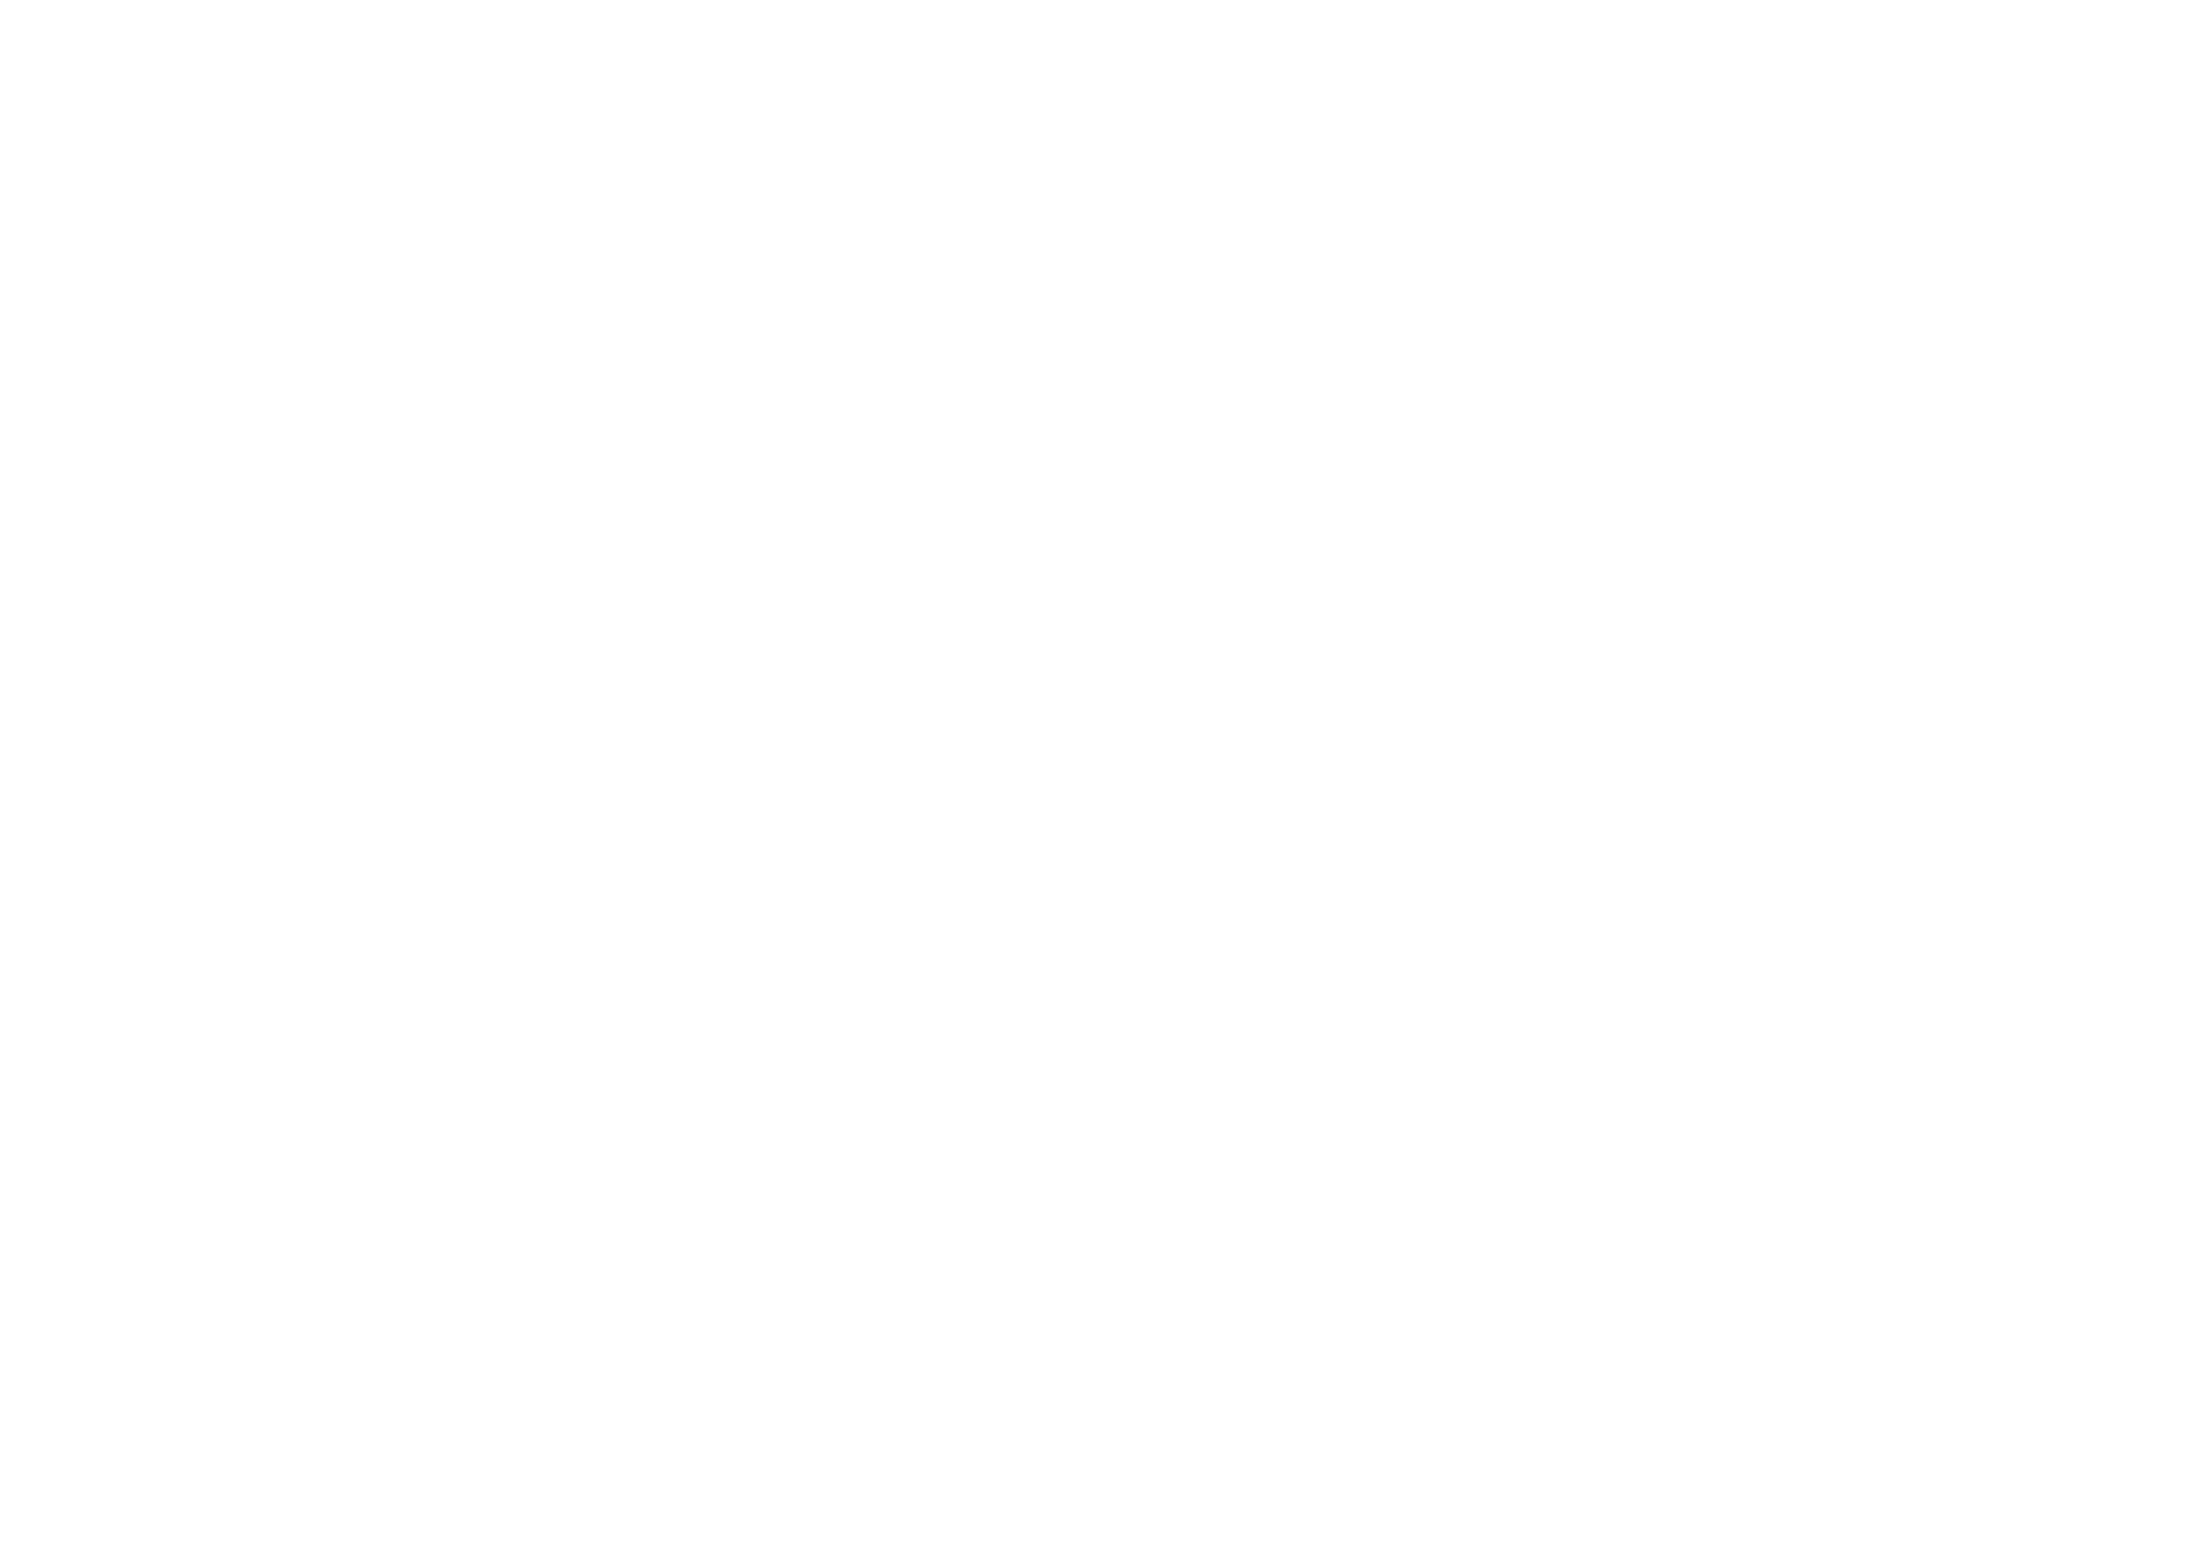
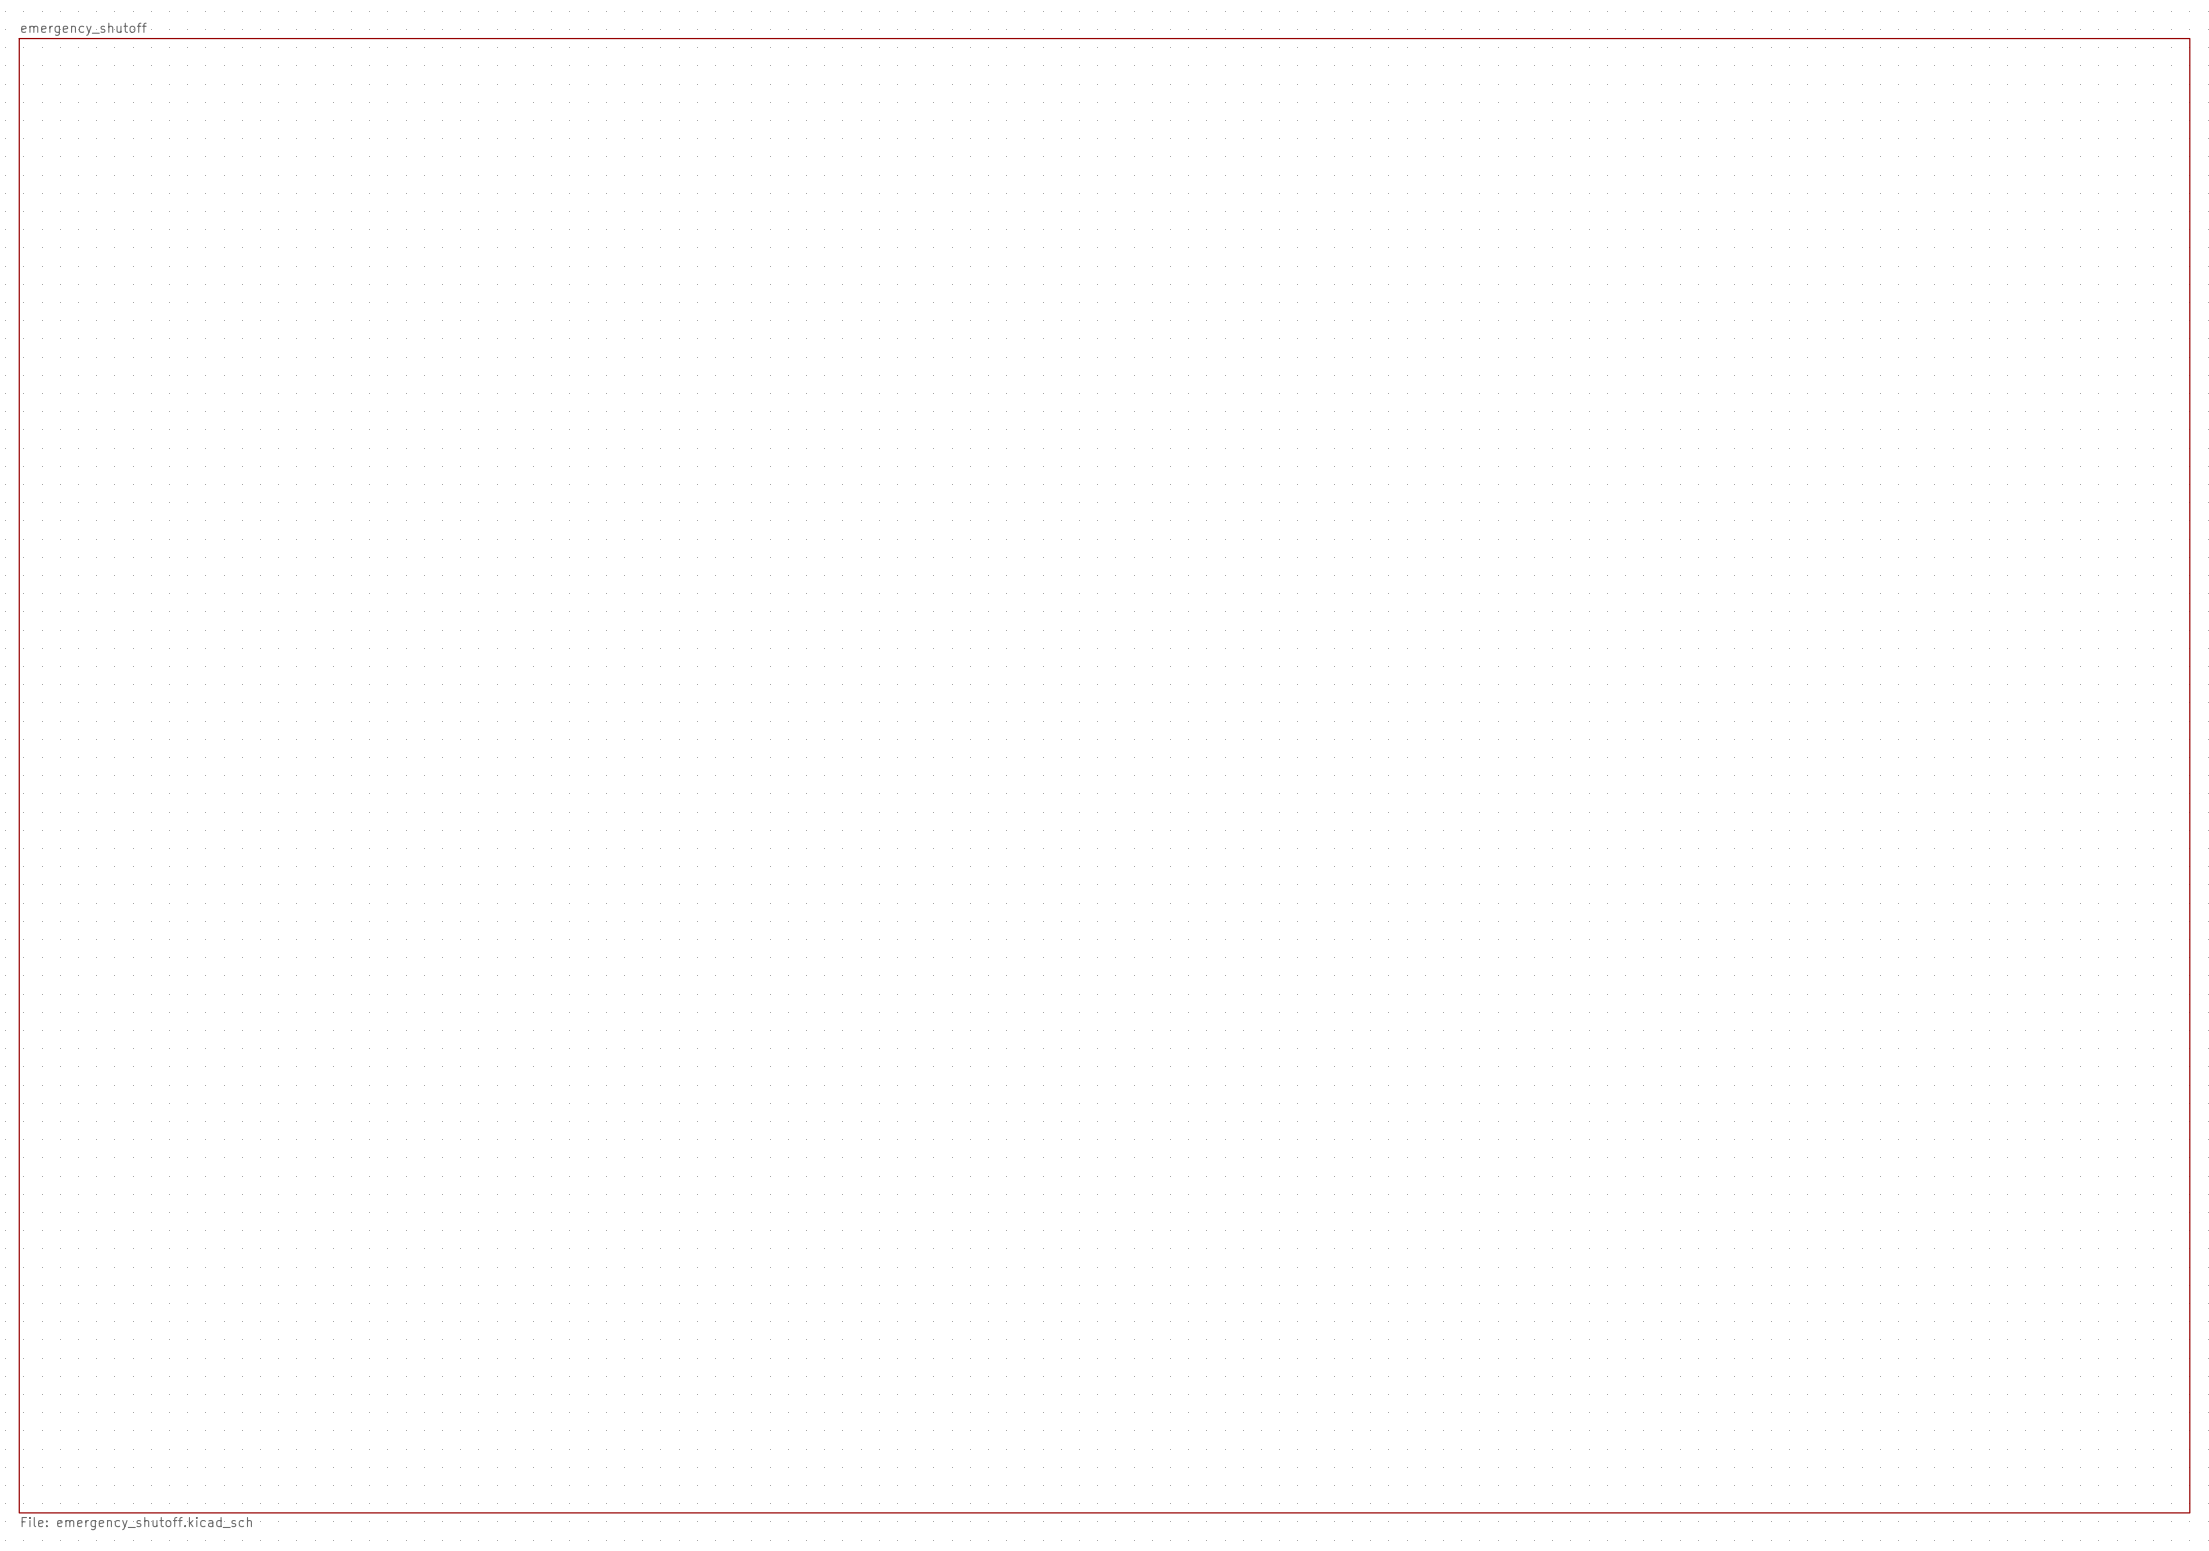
sheet emergency_shutoff: none -> File: emergency_shutoff.kicad_sch (1104, 775)

